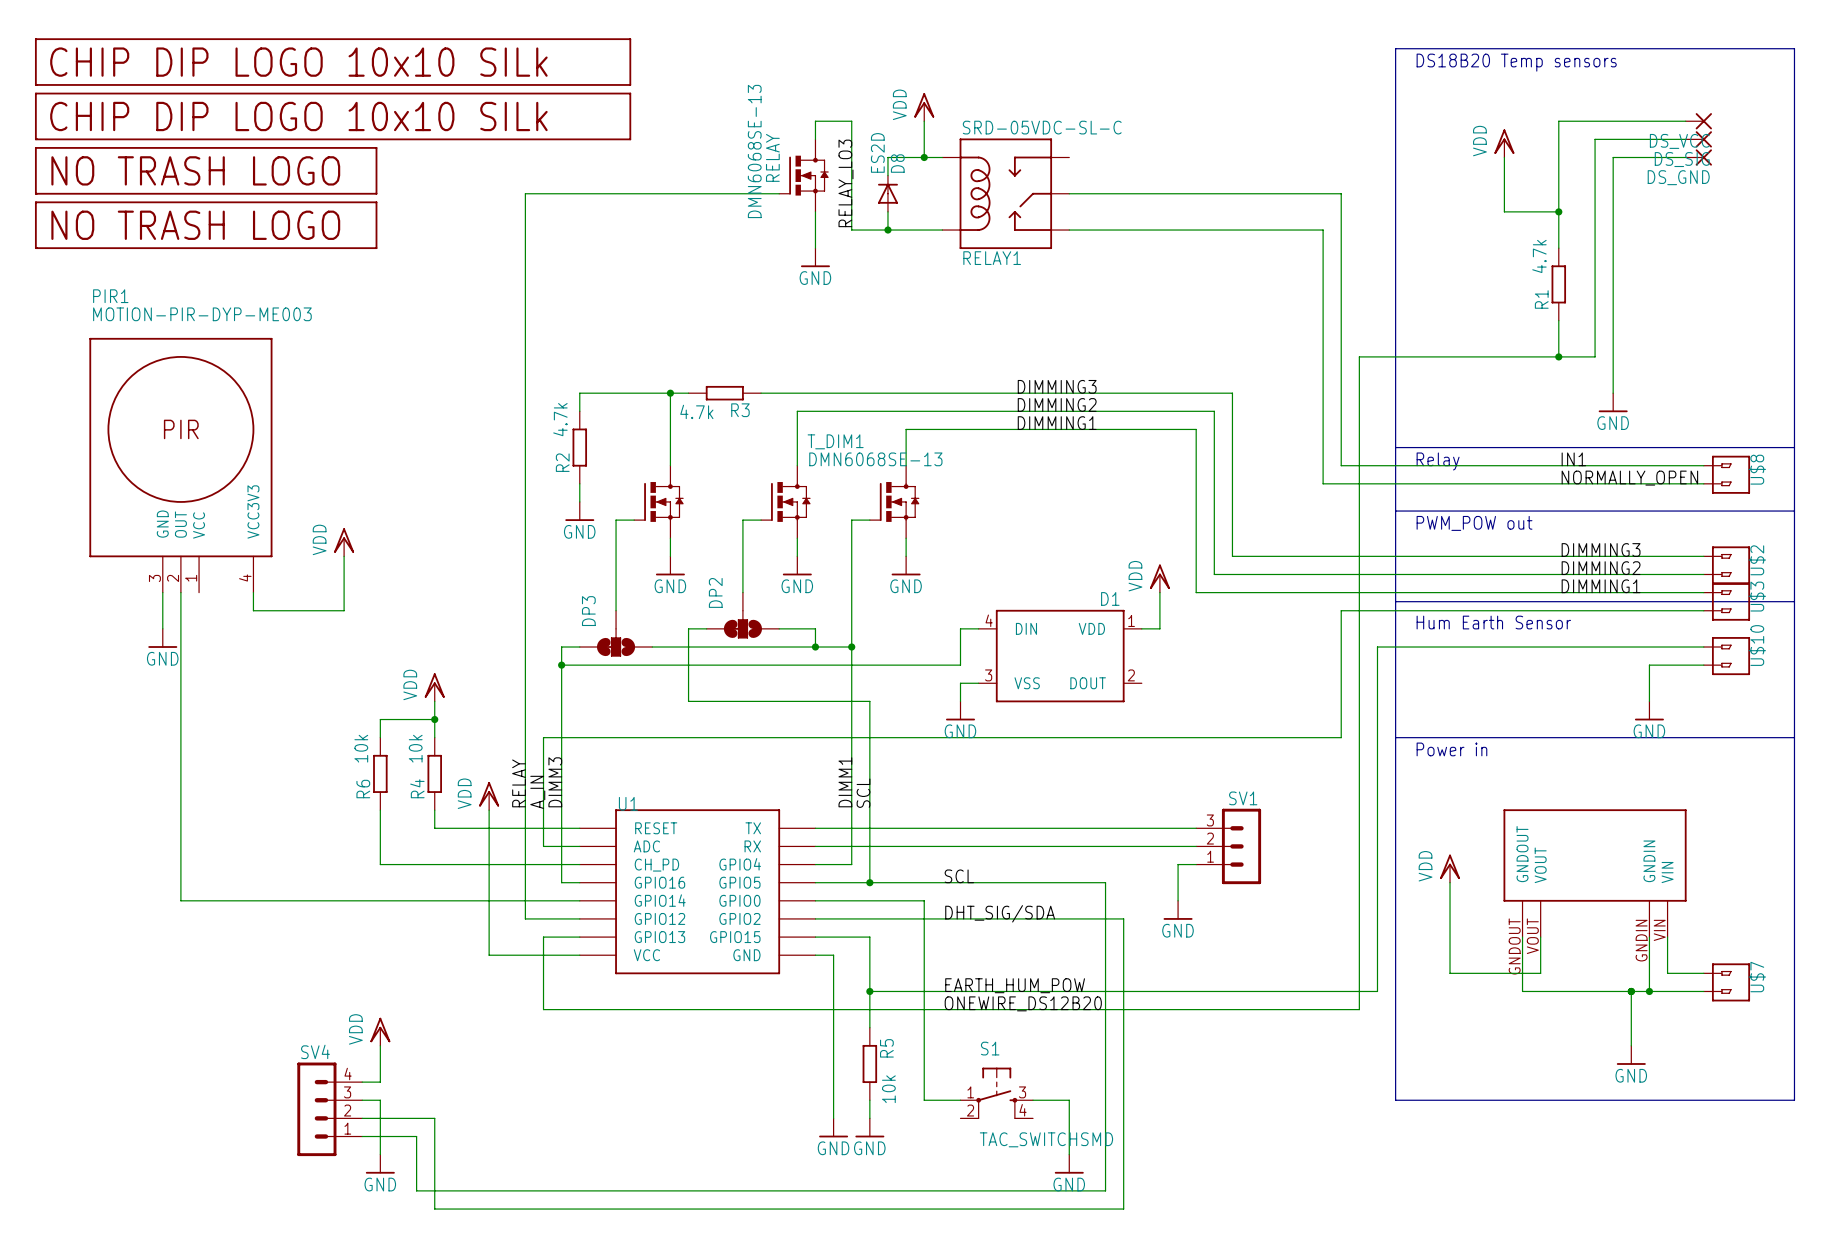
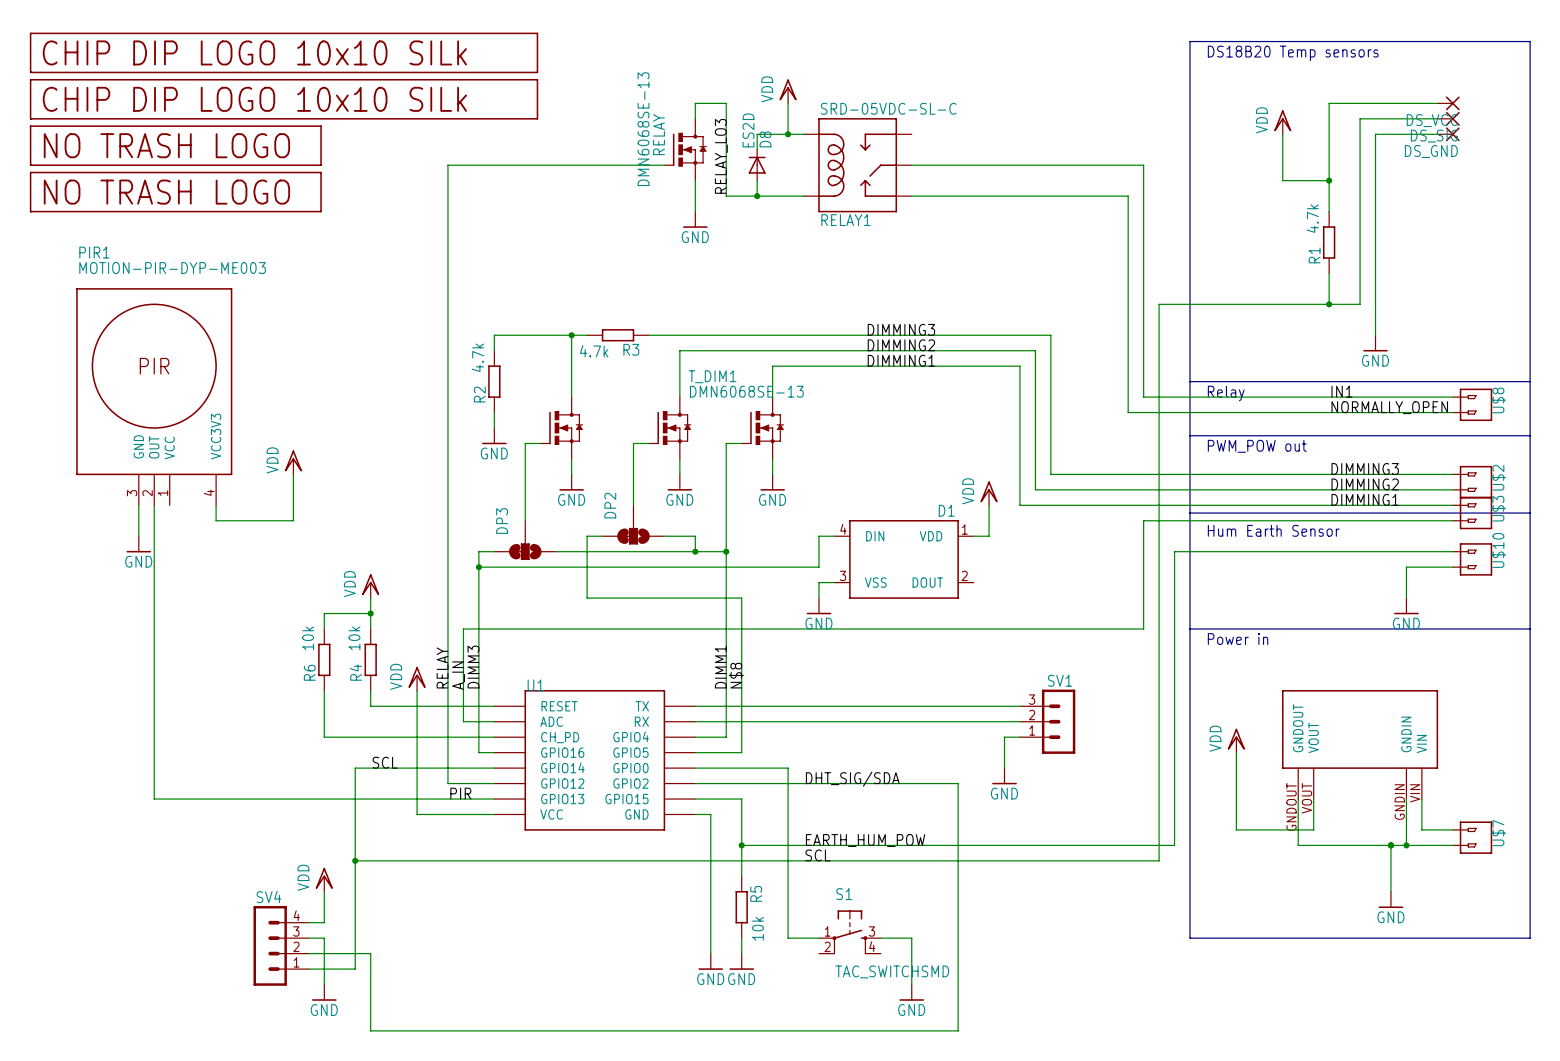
label: SCL (863, 793) -> N$8 (736, 675)
label: SCL (959, 876) -> none
wire: (869, 882) (1105, 882) (1105, 1190) (416, 1190) (416, 1136) -> (355, 768) (355, 969)
junction: (869, 882) -> none
label: none -> SCL (385, 762)
wire: (180, 900) (416, 900) -> (154, 768) (154, 799) (463, 799)
label: none -> PIR (460, 793)
wire: (543, 937) (543, 1009) -> (355, 860) (463, 860)
label: ONEWIRE_DS12B20 (1023, 1003) -> SCL (818, 855)
junction: none -> (355, 860)

